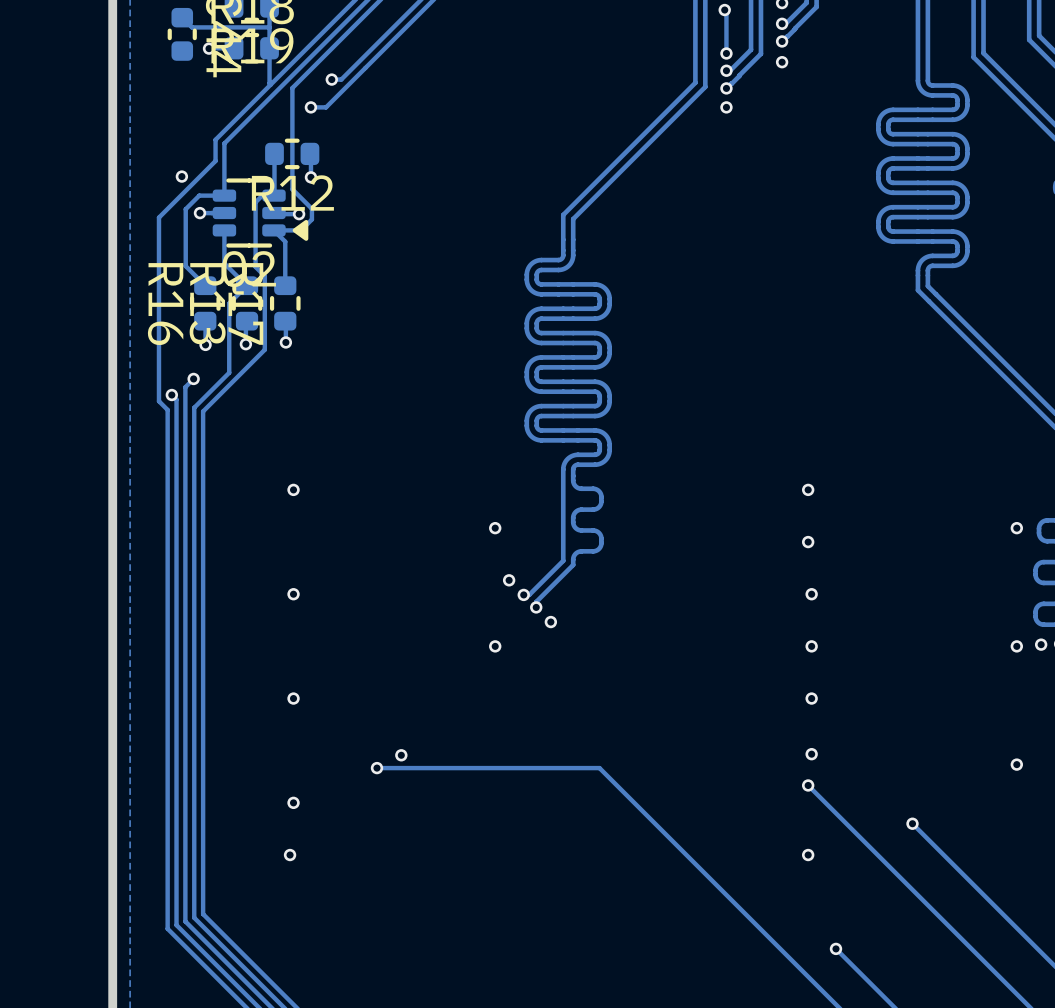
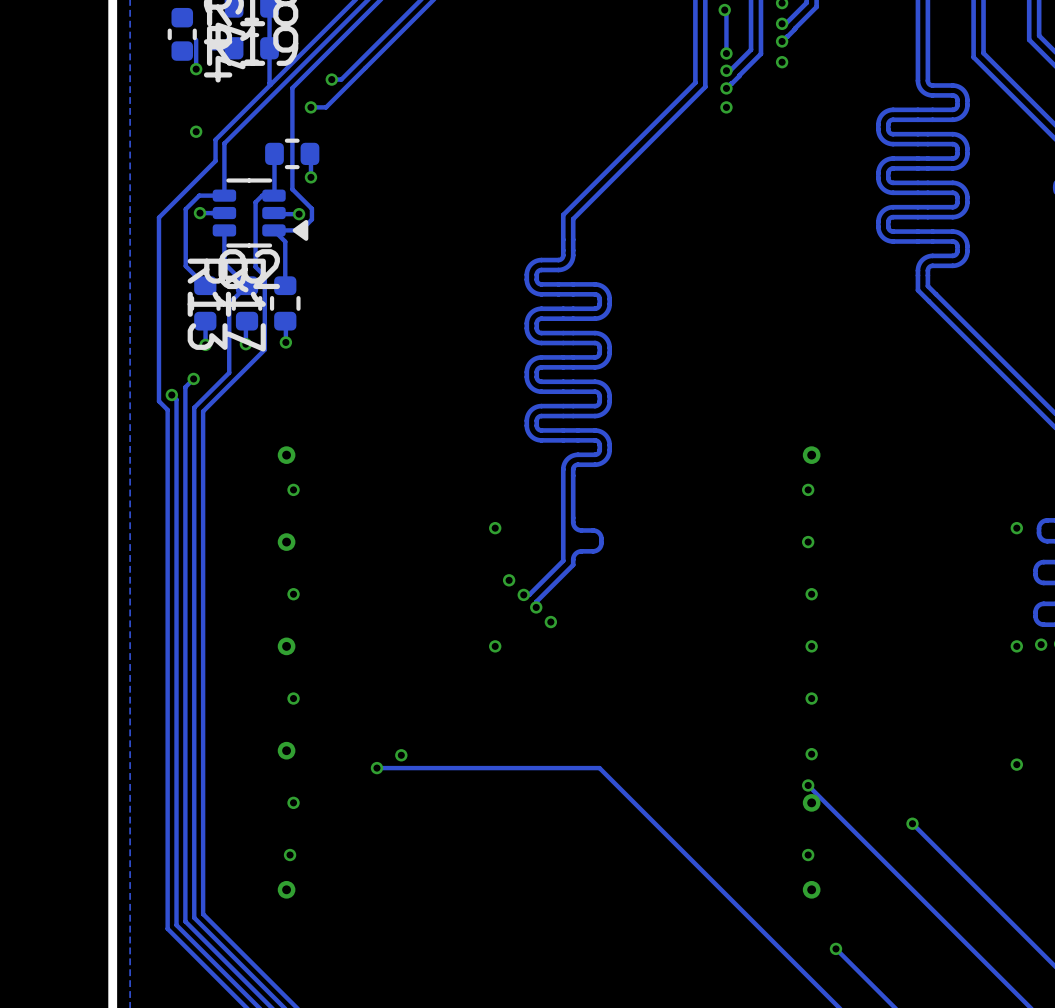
track: (182, 17) (191, 27) (269, 27) -> none
track: none -> (196, 39) (196, 69)
via position: (209, 48) -> (196, 69)
via: none -> (196, 131)
via: (181, 176) -> none
R12 name: R12 (292, 192) -> none
R16 name: R16 (165, 304) -> none
via: none -> (286, 455)
via: none -> (811, 455)
track: (573, 480) (577, 487) (595, 489) (599, 491) (601, 497) (601, 504) (598, 507) (578, 510) (575, 512) (573, 517) -> (573, 480) (573, 517)
via: none -> (286, 542)
via: none -> (286, 646)
via: none -> (286, 750)
via: none -> (811, 802)
via: none -> (286, 889)
via: none -> (811, 889)

